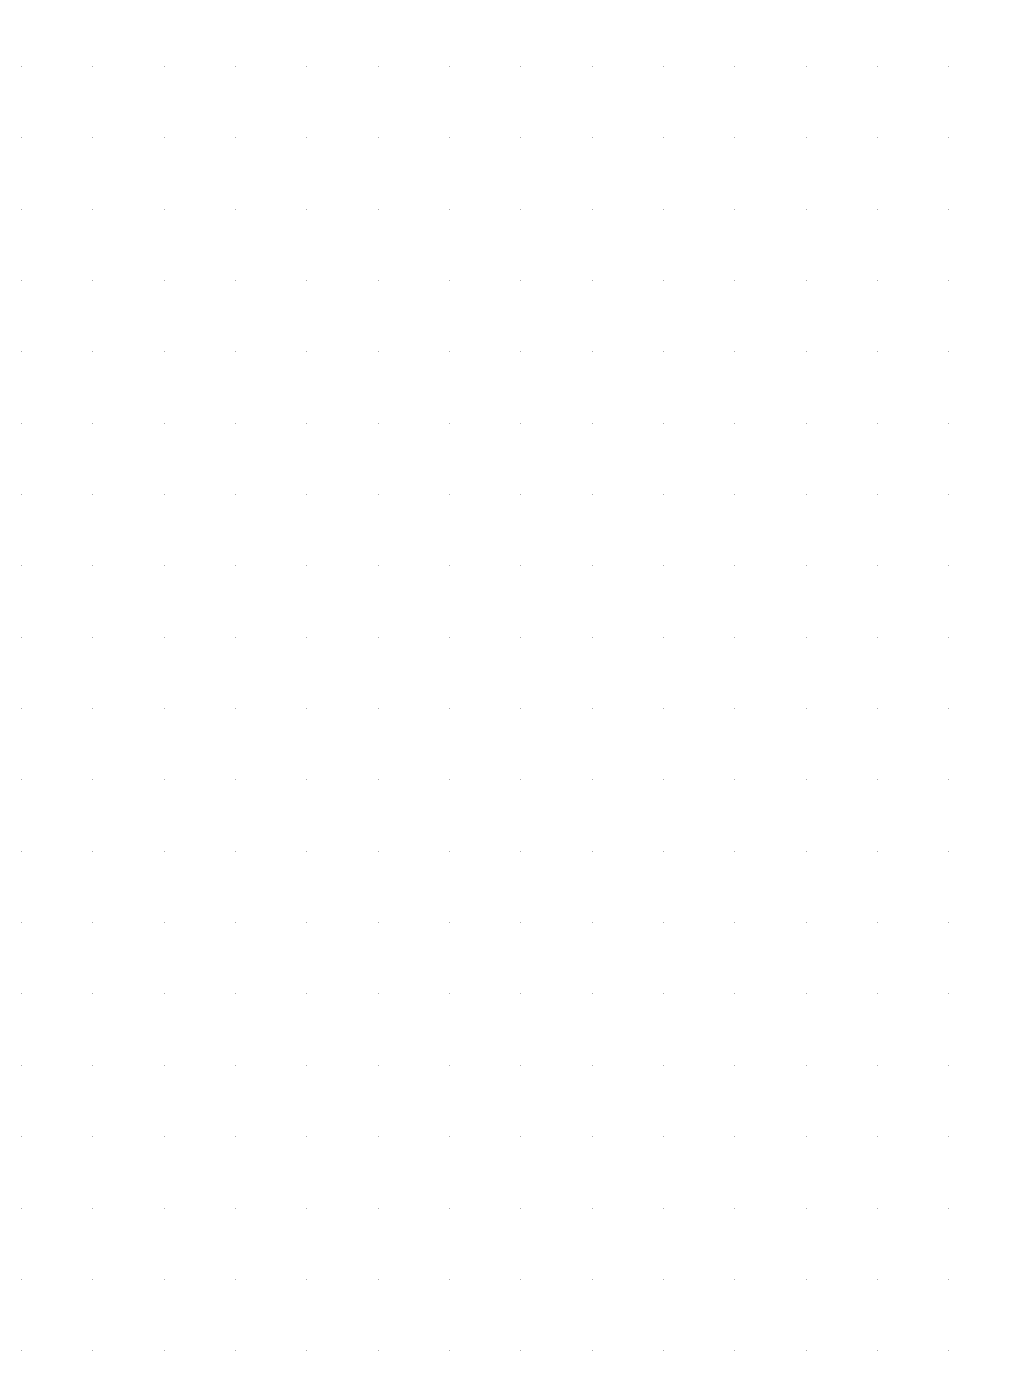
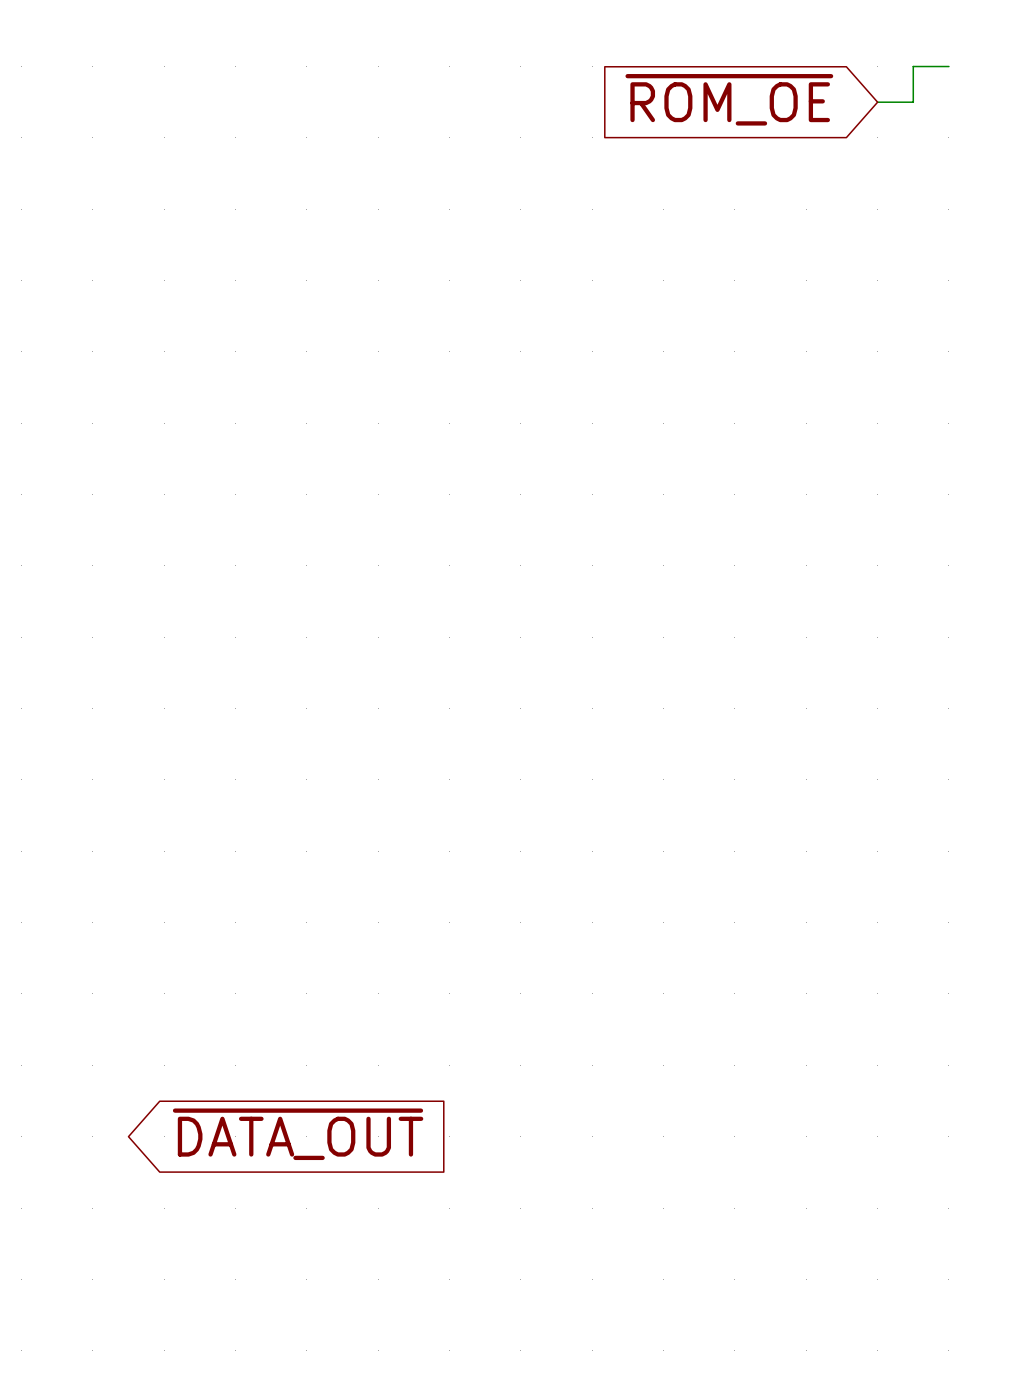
wire: none -> (948, 66) (913, 66) (913, 102) (877, 102)
global label: none -> ~{ROM_OE} (729, 99)
global label: none -> ~{DATA_OUT} (298, 1134)

